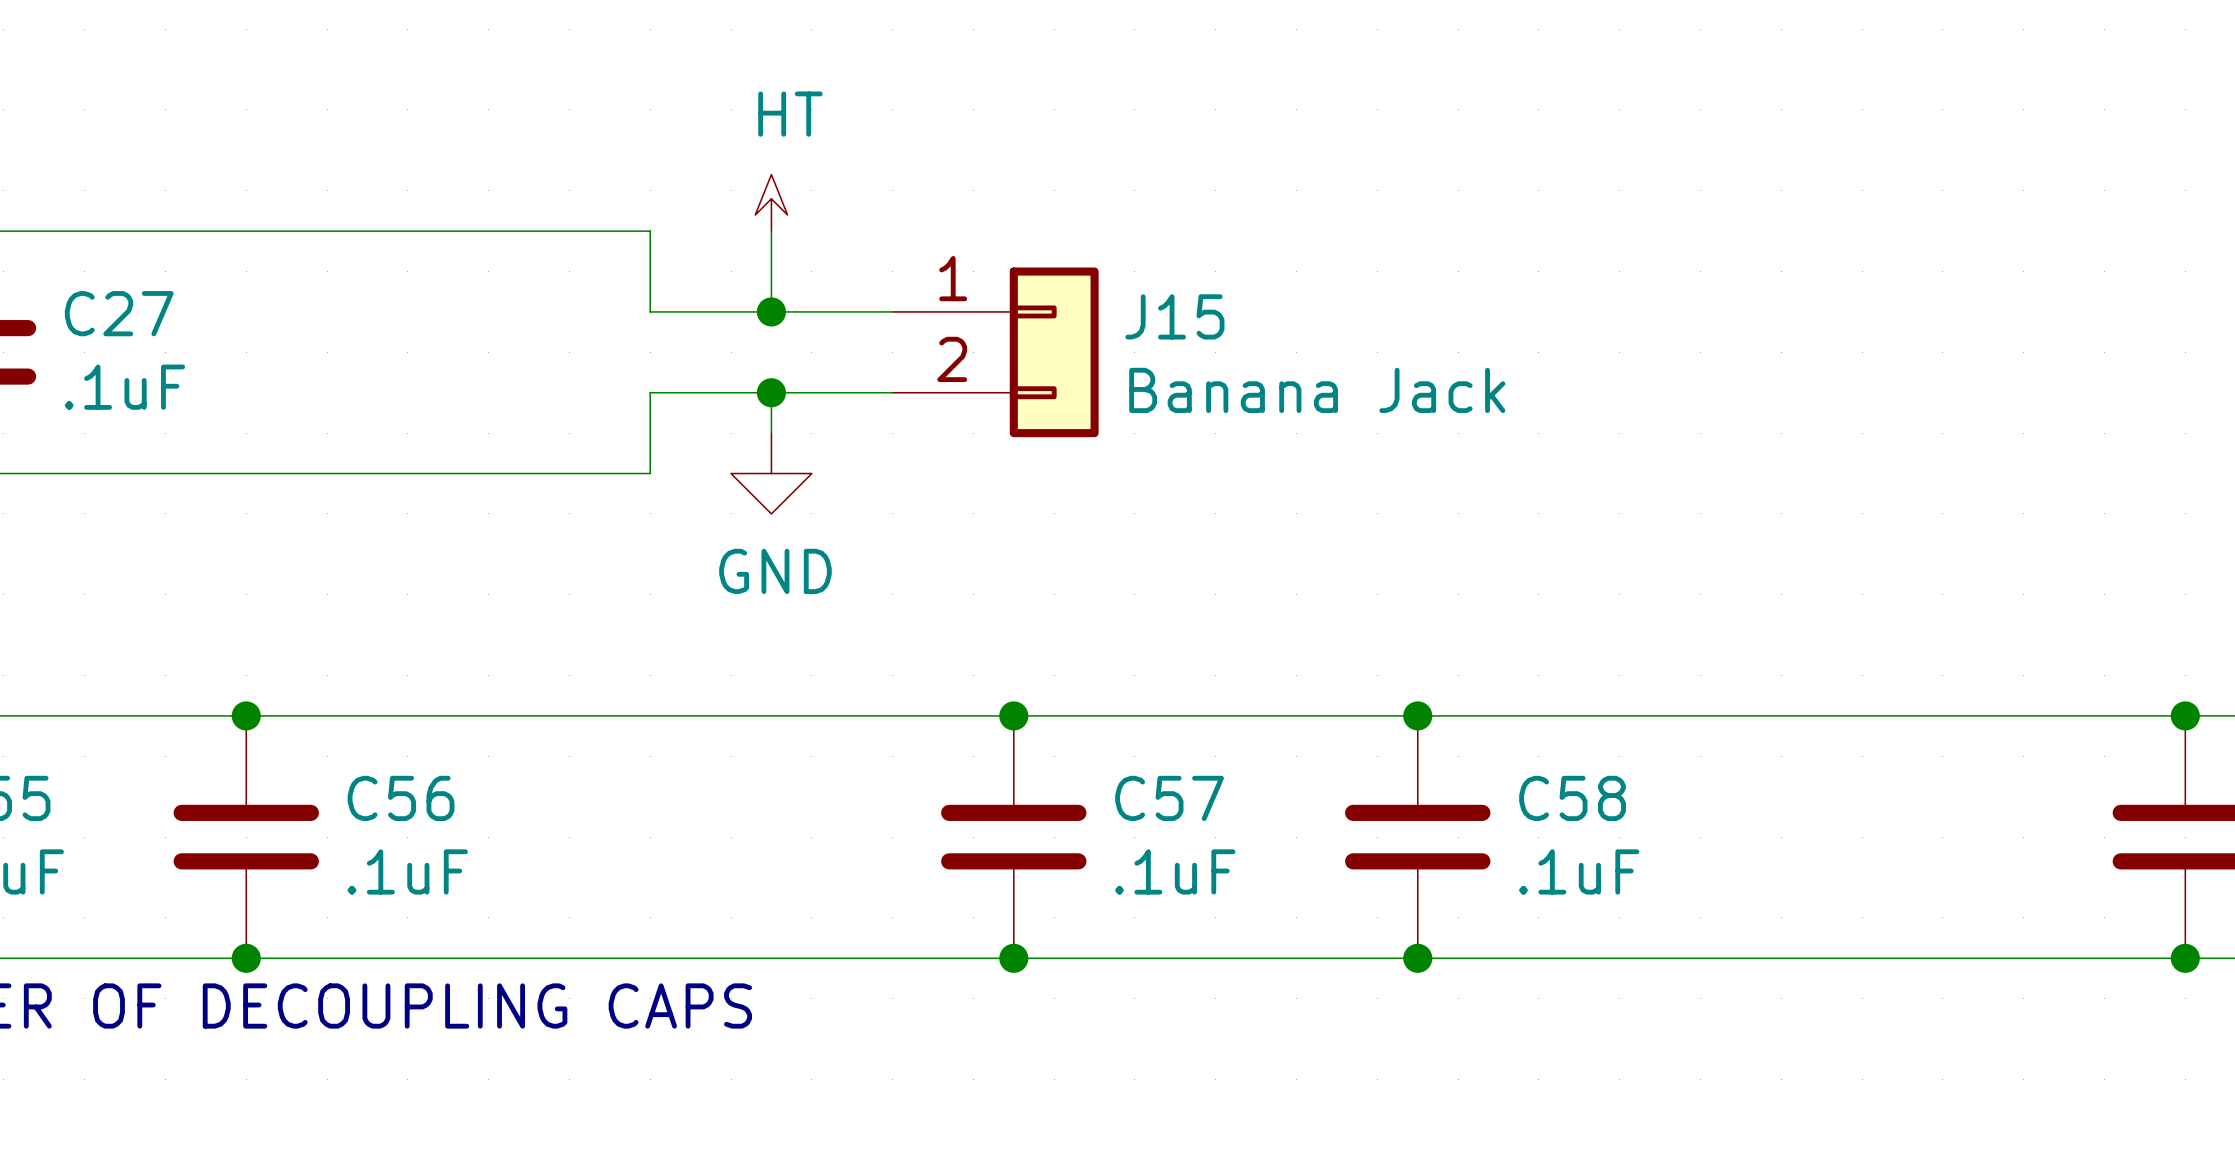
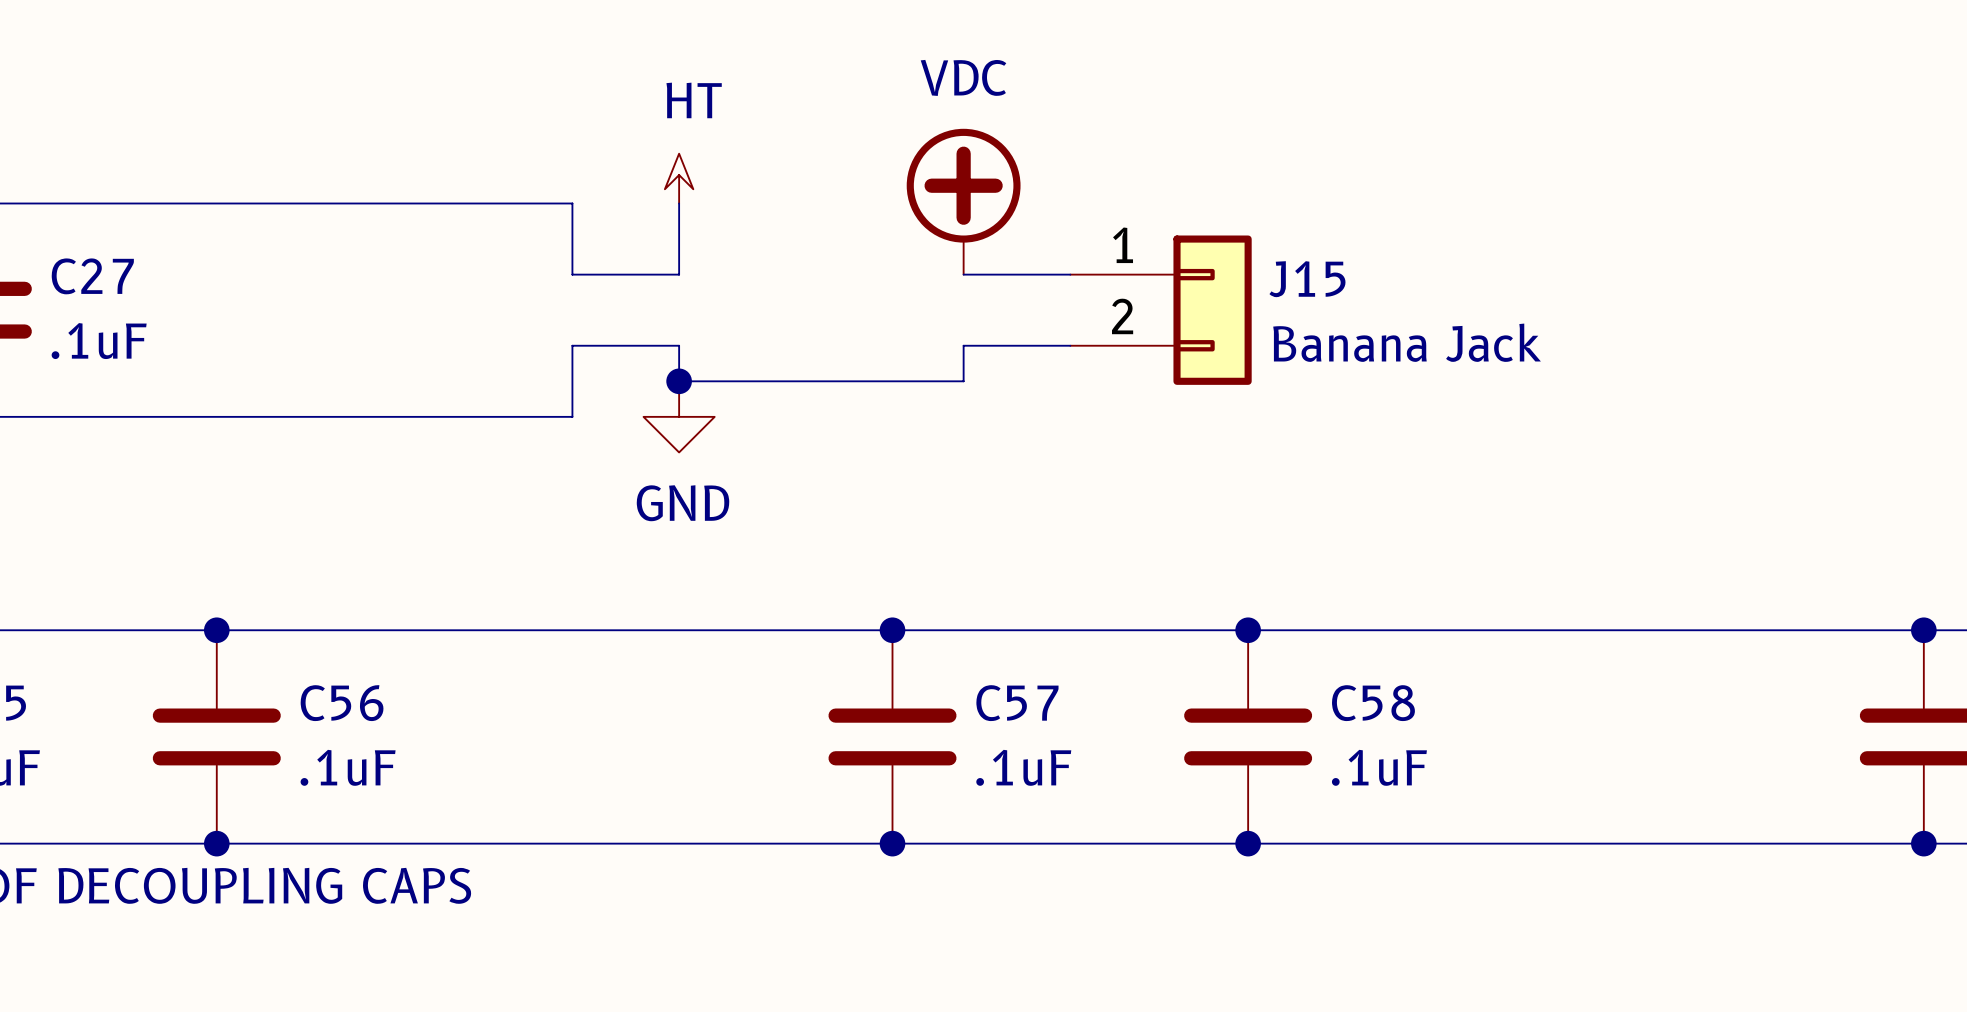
power symbol: none -> VDC (963, 201)
wire: (771, 311) (892, 311) -> (963, 274) (1070, 274)
junction: (771, 311) -> none
J15 position: (995, 352) -> (1161, 310)
wire: (771, 392) (892, 392) -> none
junction position: (771, 392) -> (679, 381)
wire: none -> (1070, 345) (963, 345) (963, 381) (679, 381)

